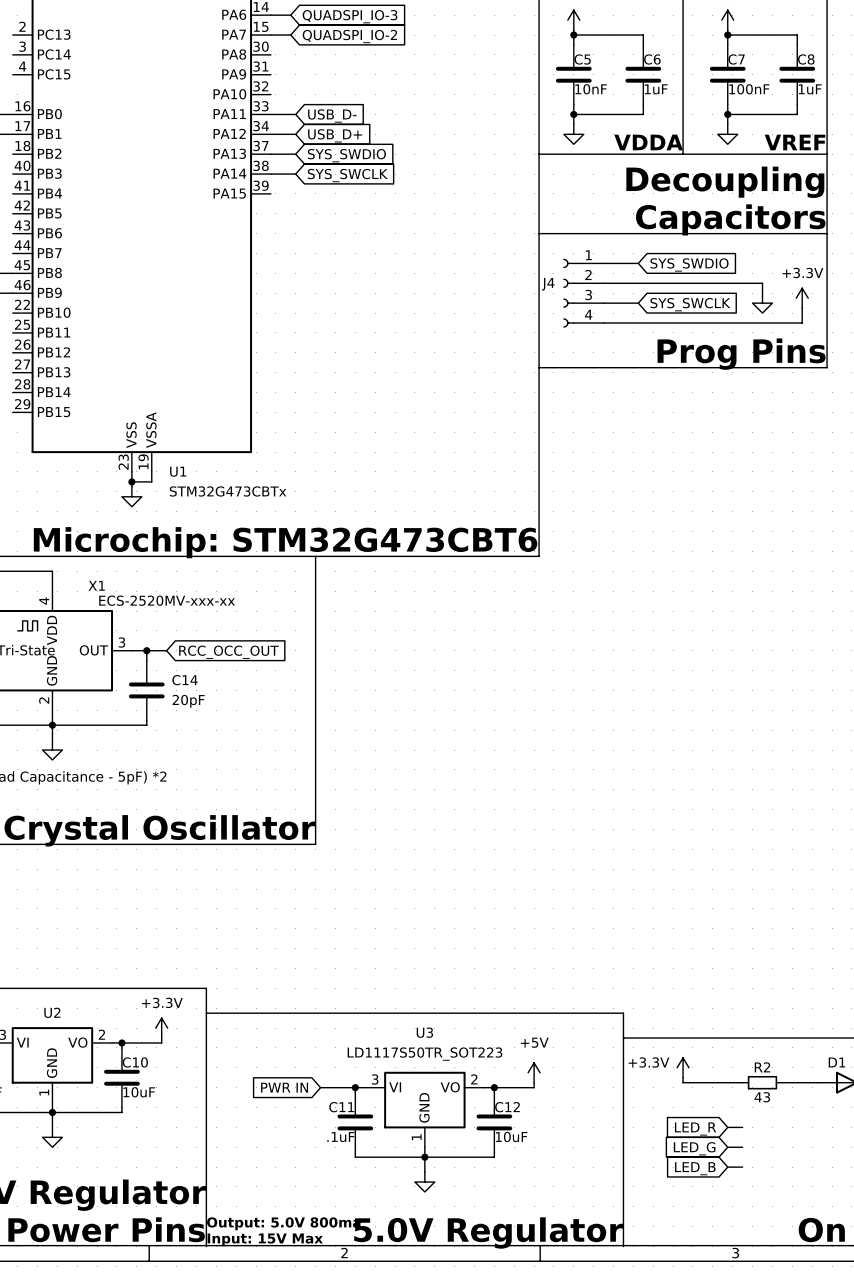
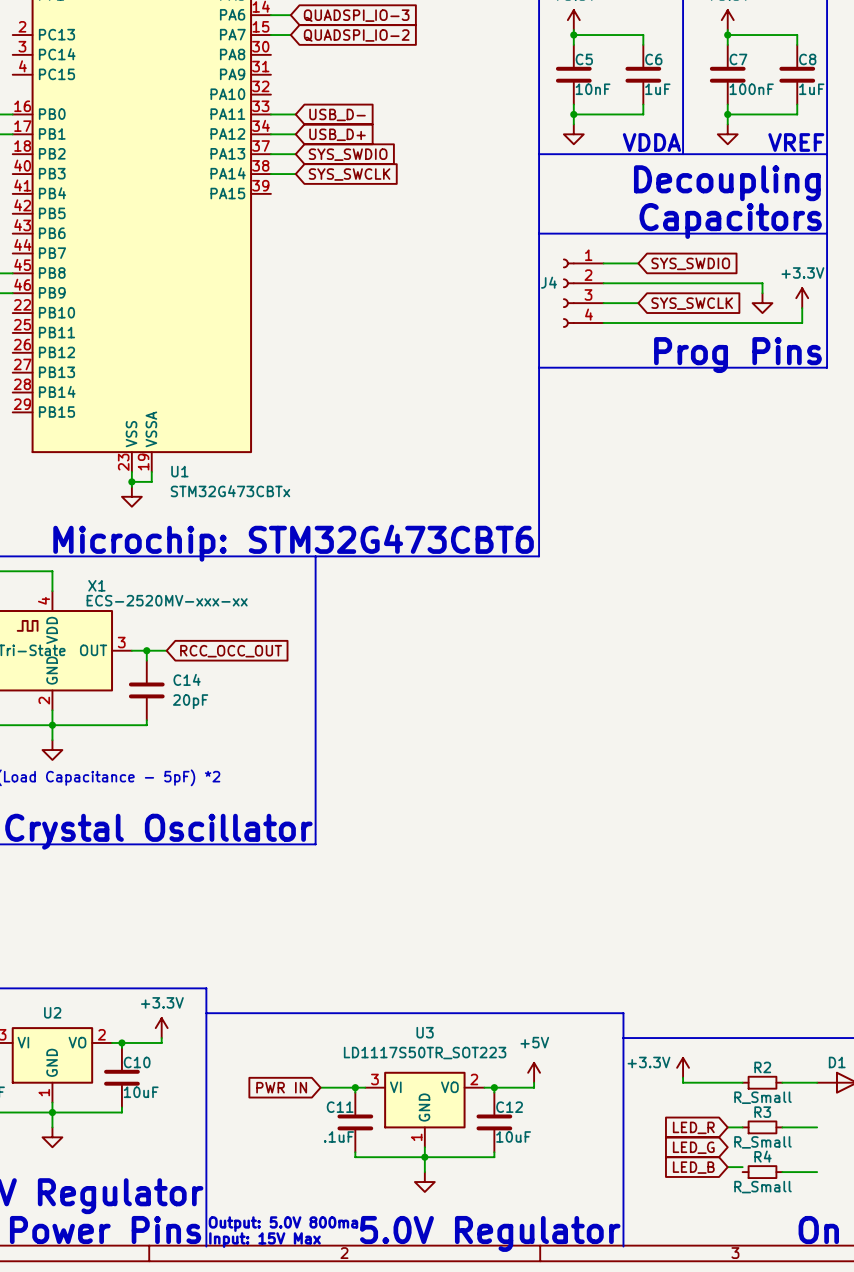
R2 value: 43 (762, 1097) -> R_Small (762, 1097)
R3: none -> R_Small (762, 1127)
wire: none -> (782, 1127) (817, 1127)
wire: (727, 1147) (742, 1147) -> none
R4: none -> R_Small (762, 1172)
wire: none -> (782, 1172) (817, 1172)

